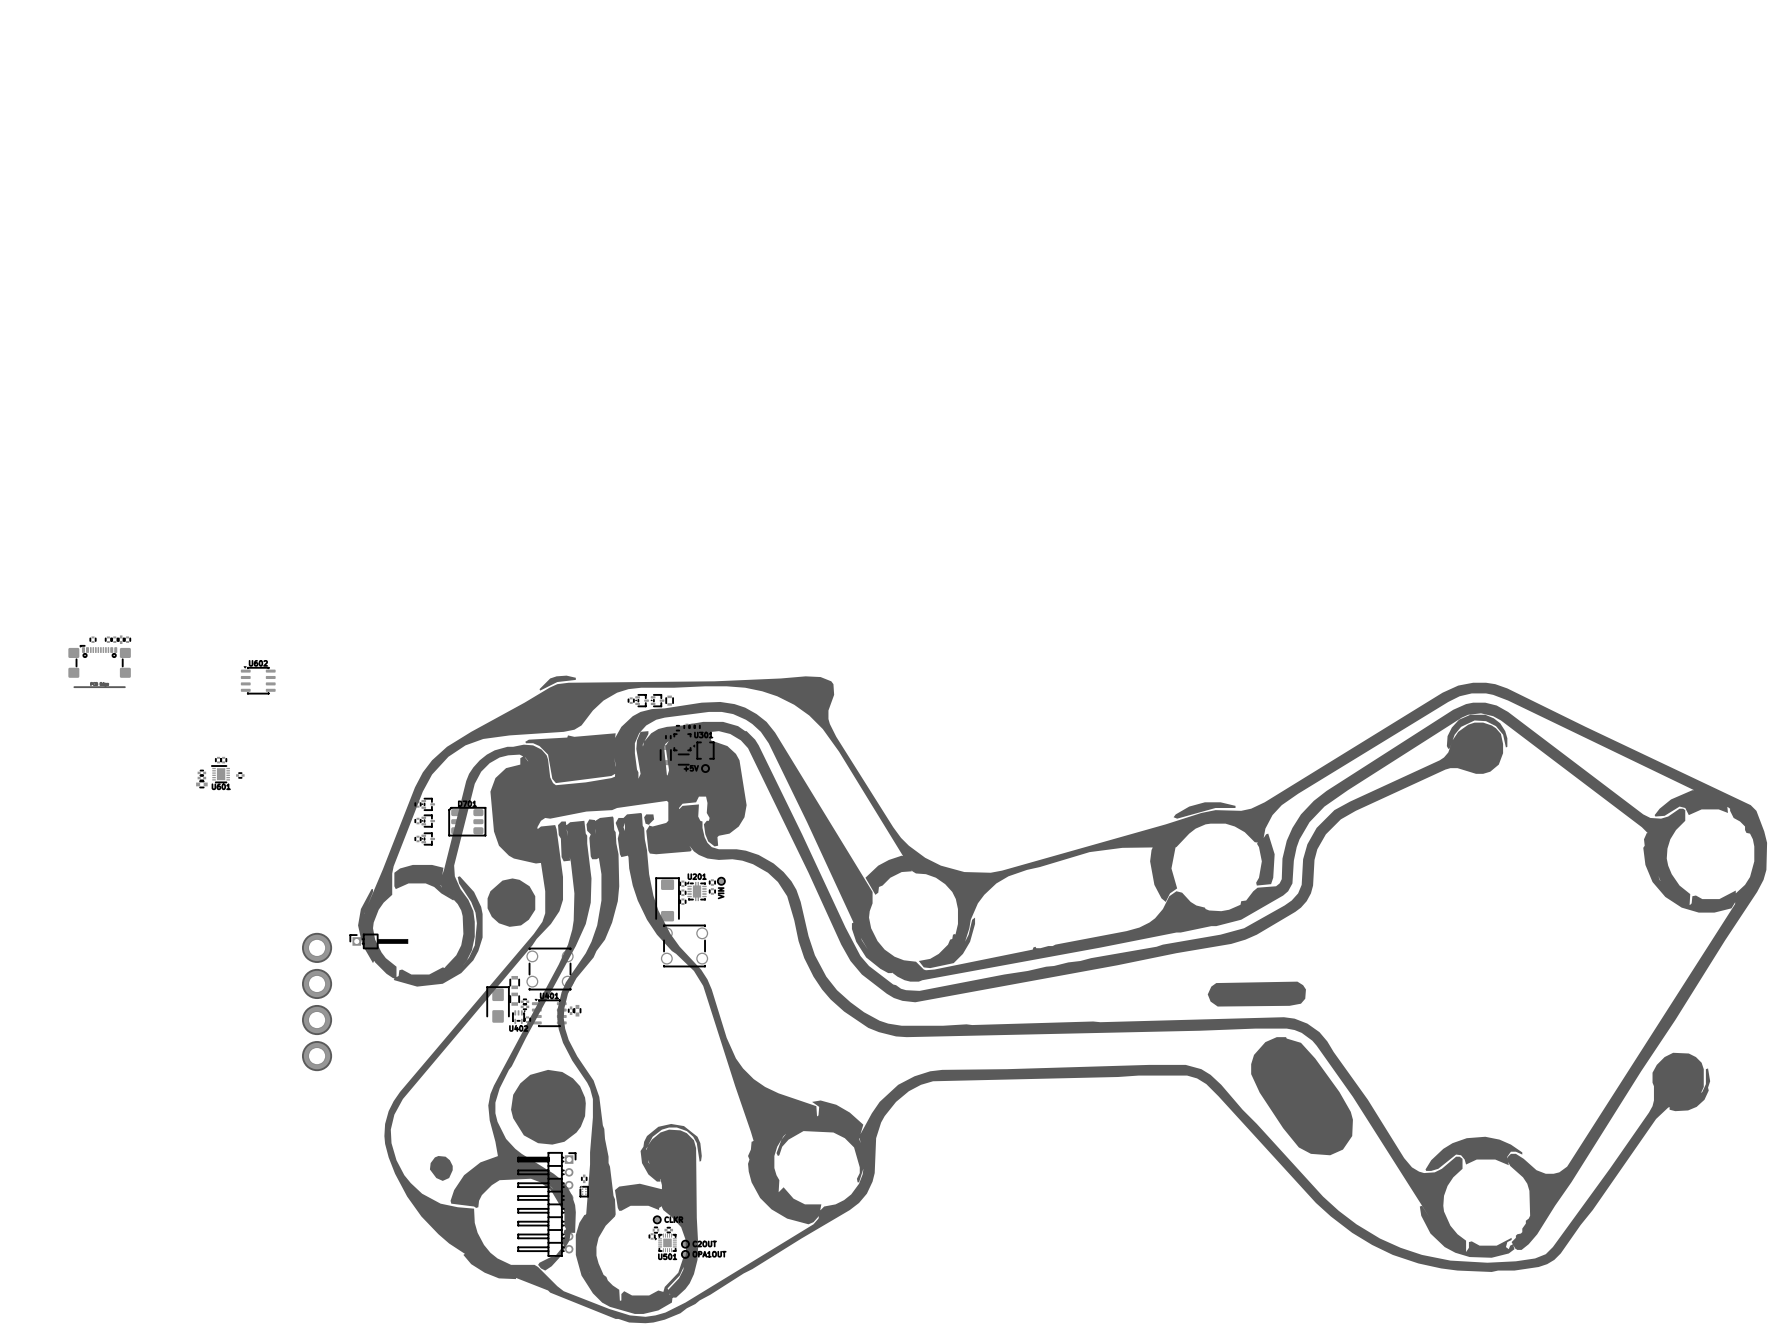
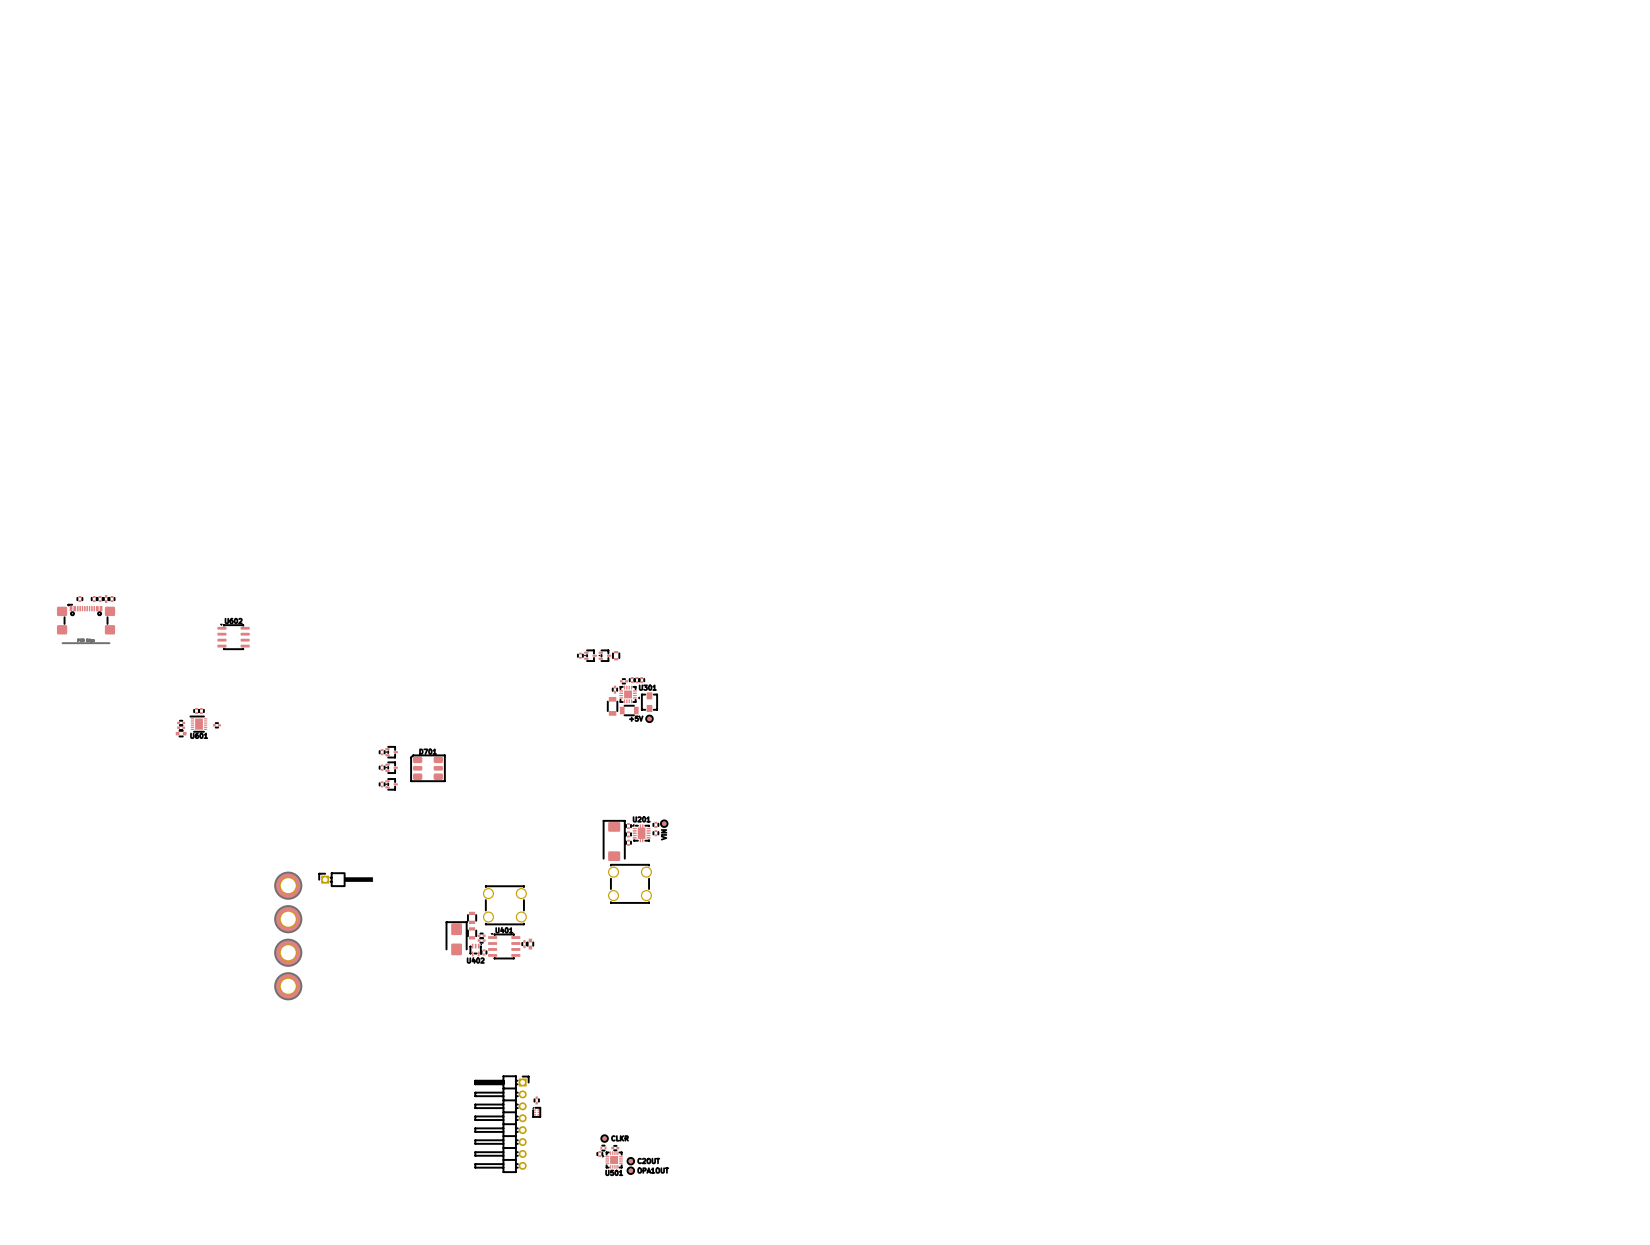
drawing: [358, 675, 1768, 1324] -> none

